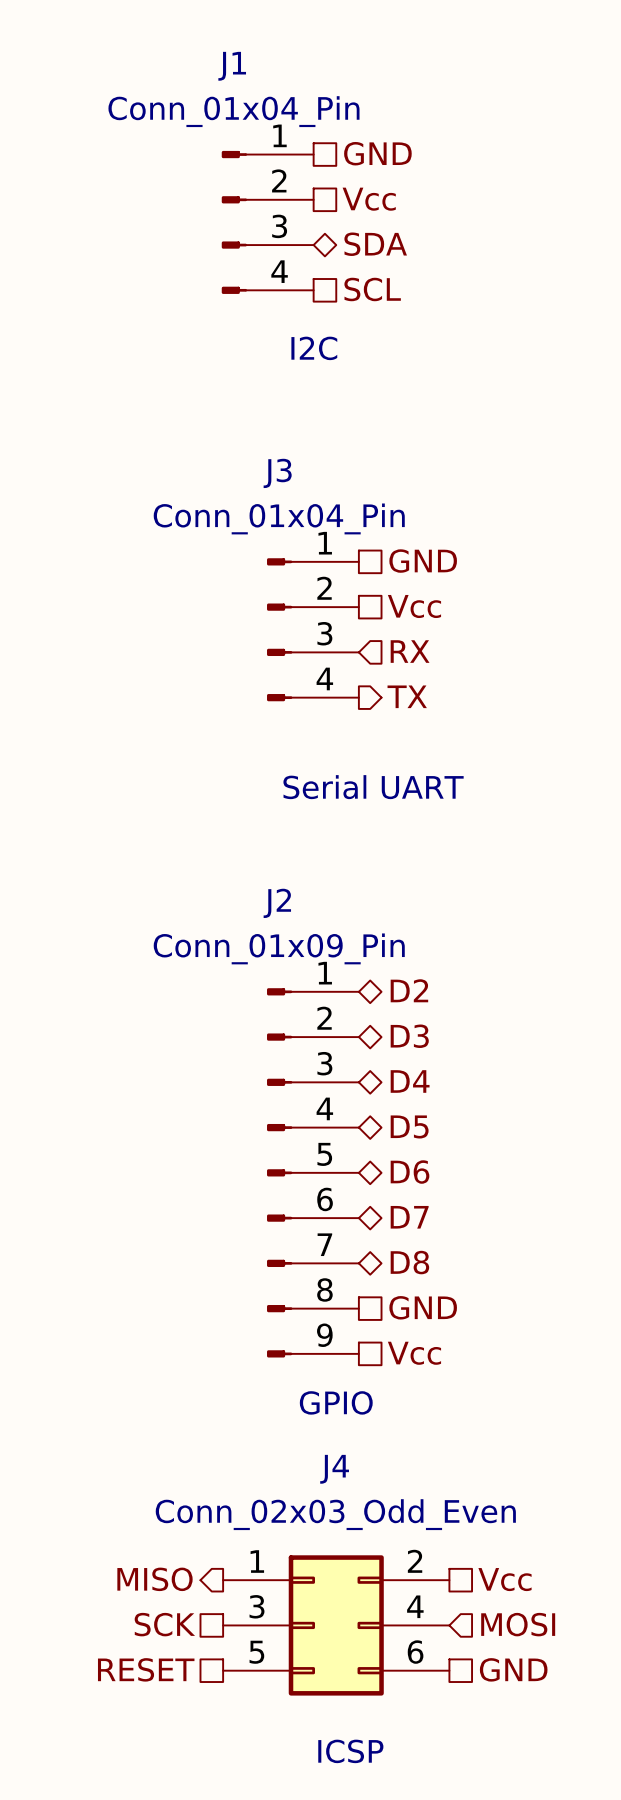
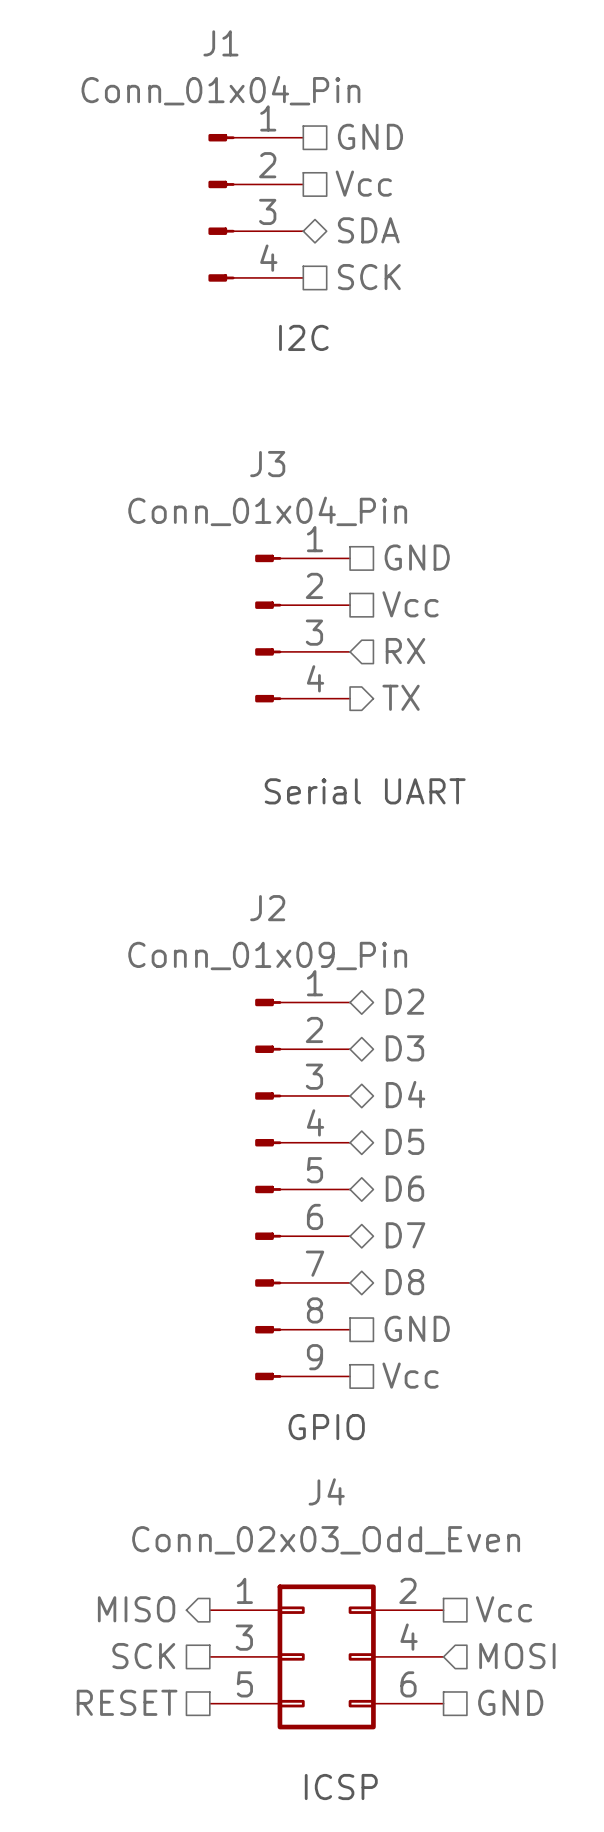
hierarchical label: SCL (372, 289) -> SCK (369, 277)

